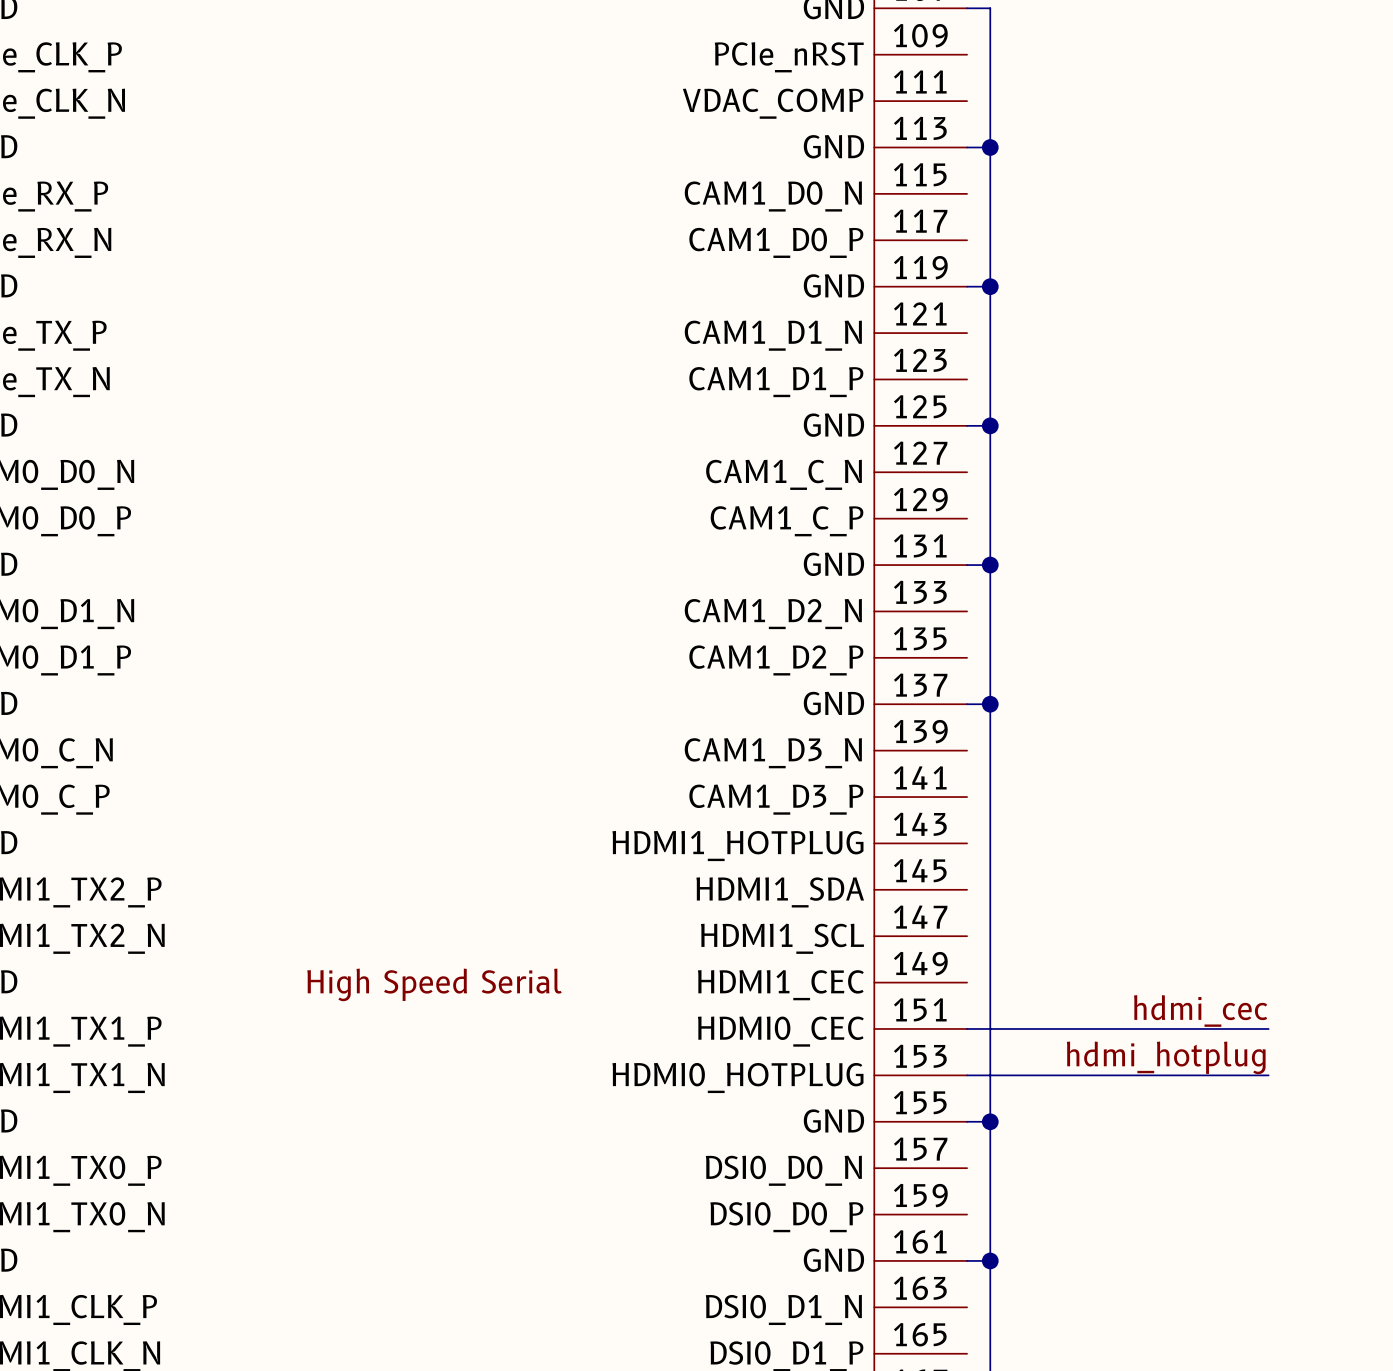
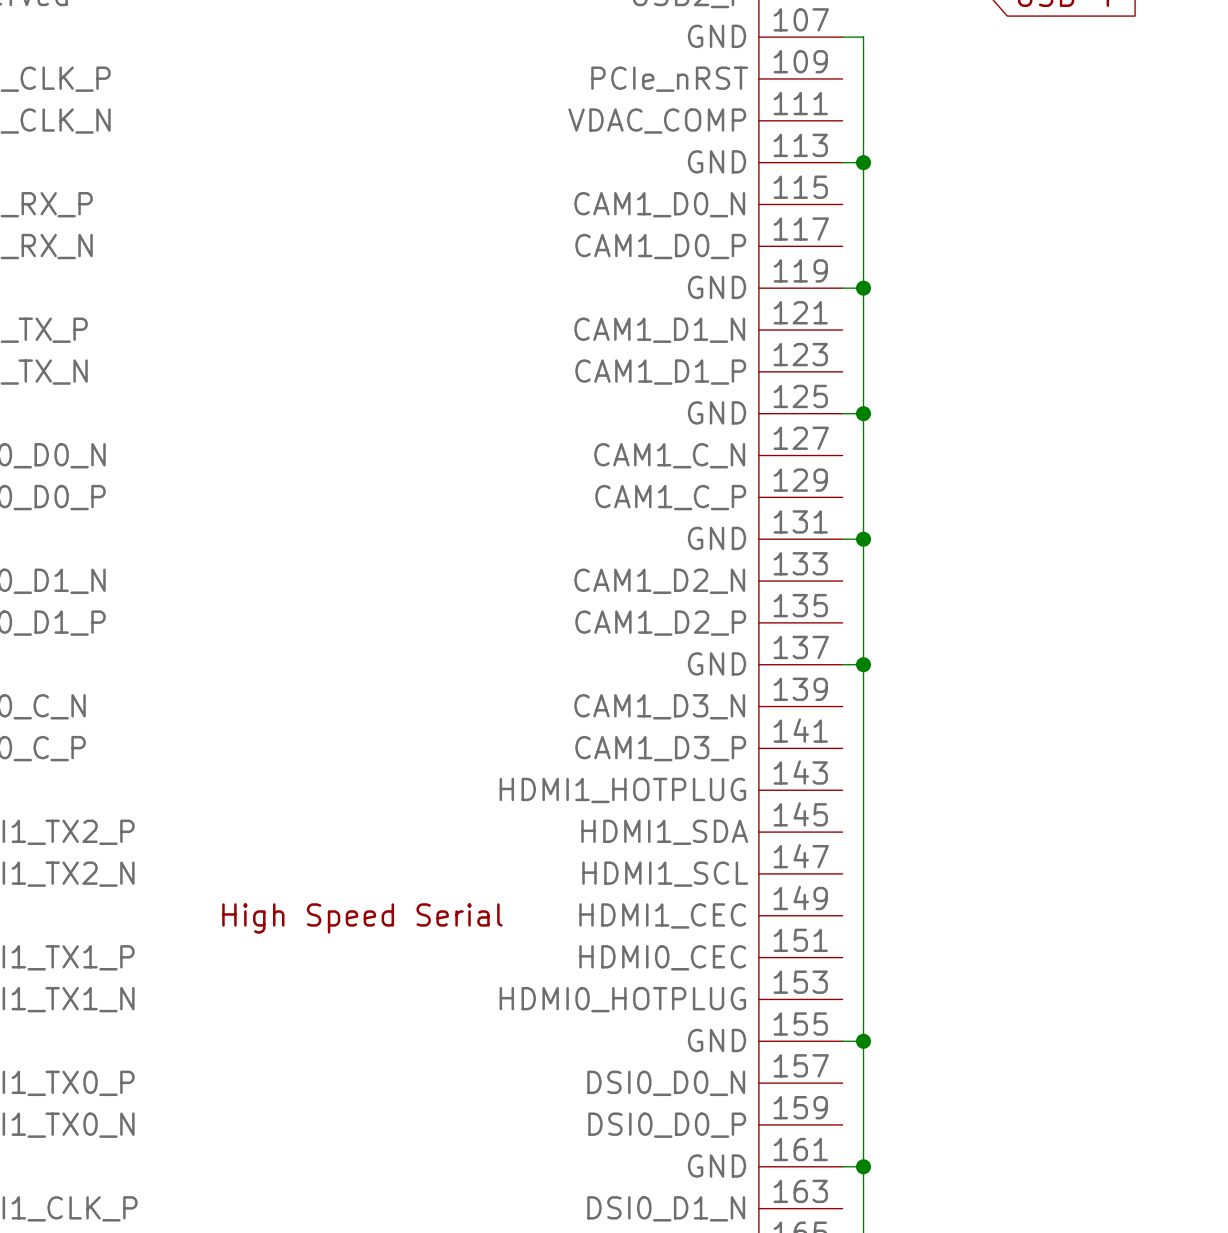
label: hdmi_cec (1200, 1011) -> none
wire: (967, 1028) (1268, 1028) -> none
label: hdmi_hotplug (1166, 1057) -> none
wire: (967, 1075) (1268, 1075) -> none

